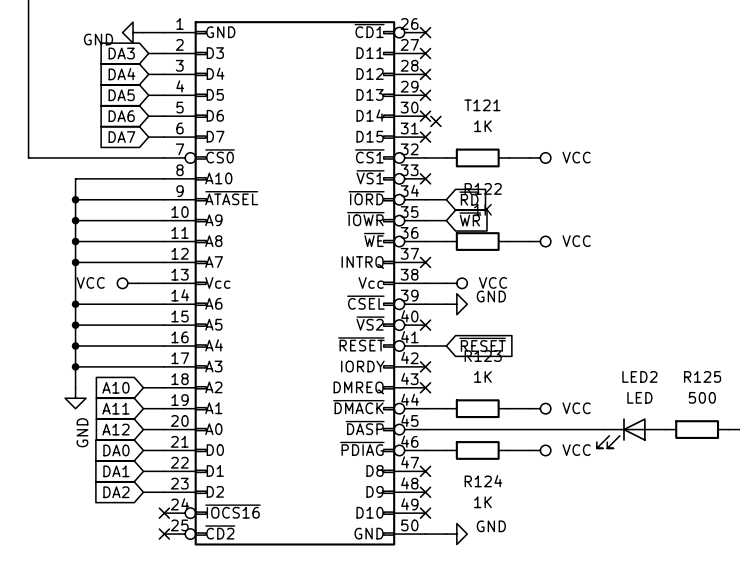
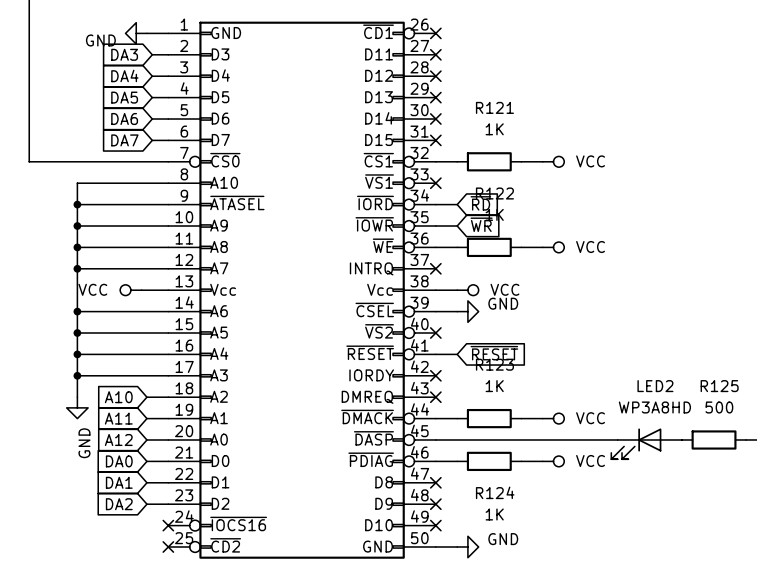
T121 name: T121 (482, 105) -> R121 (494, 107)
no-connect mark: (435, 121) -> none
LED2 value: LED (639, 397) -> WP3A8HD (654, 407)

